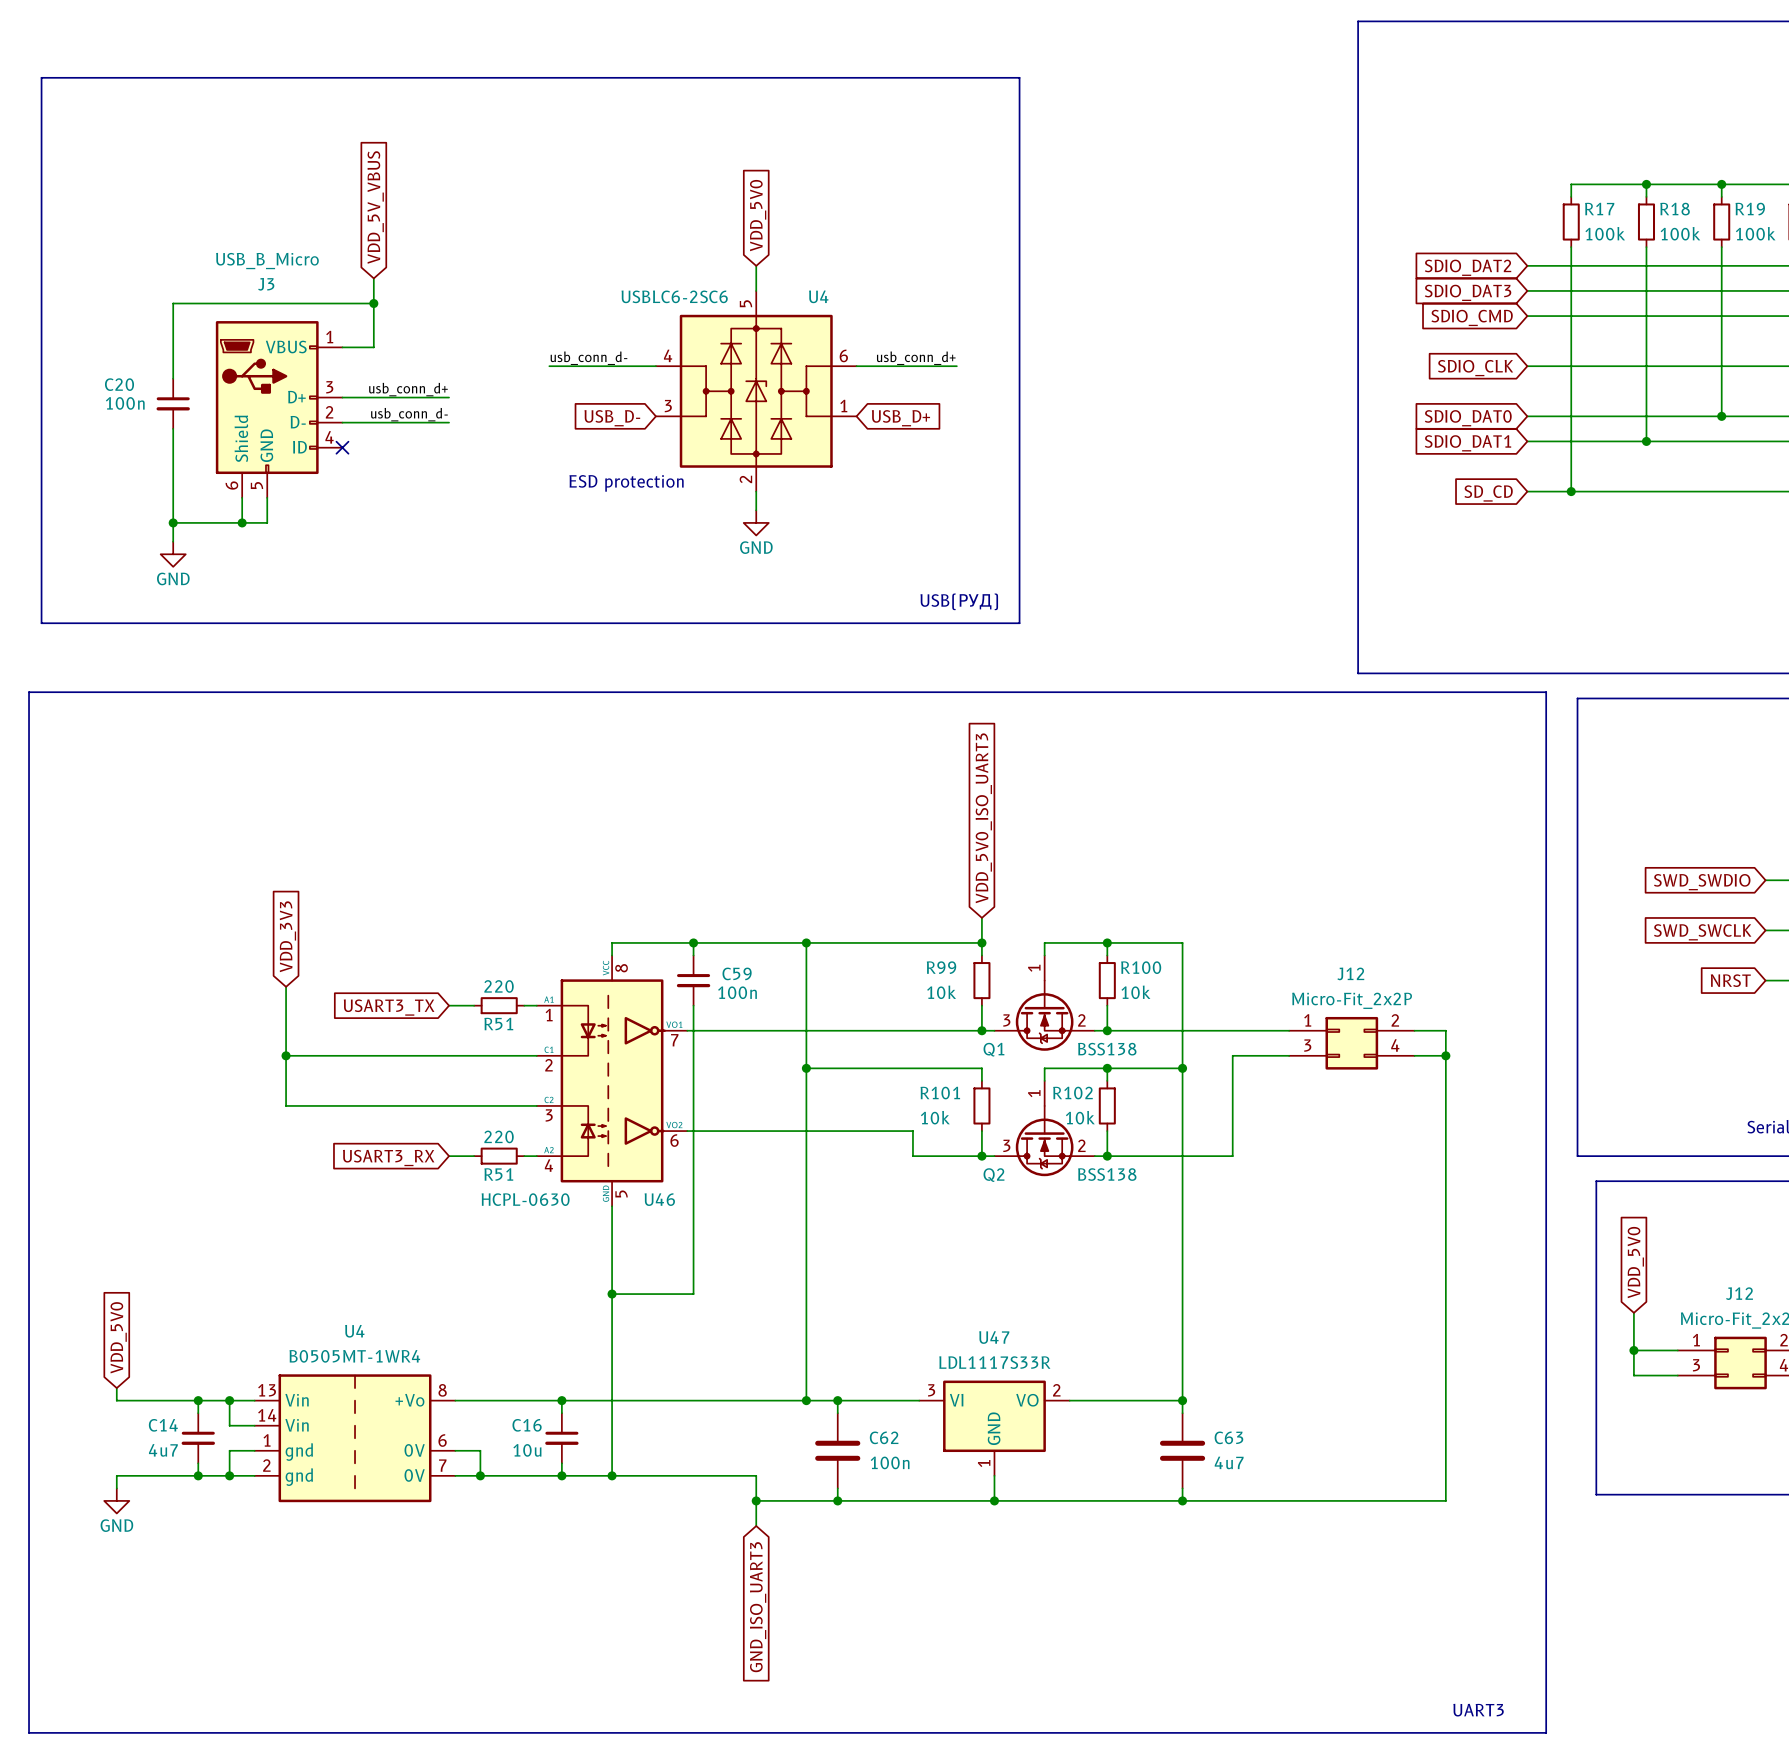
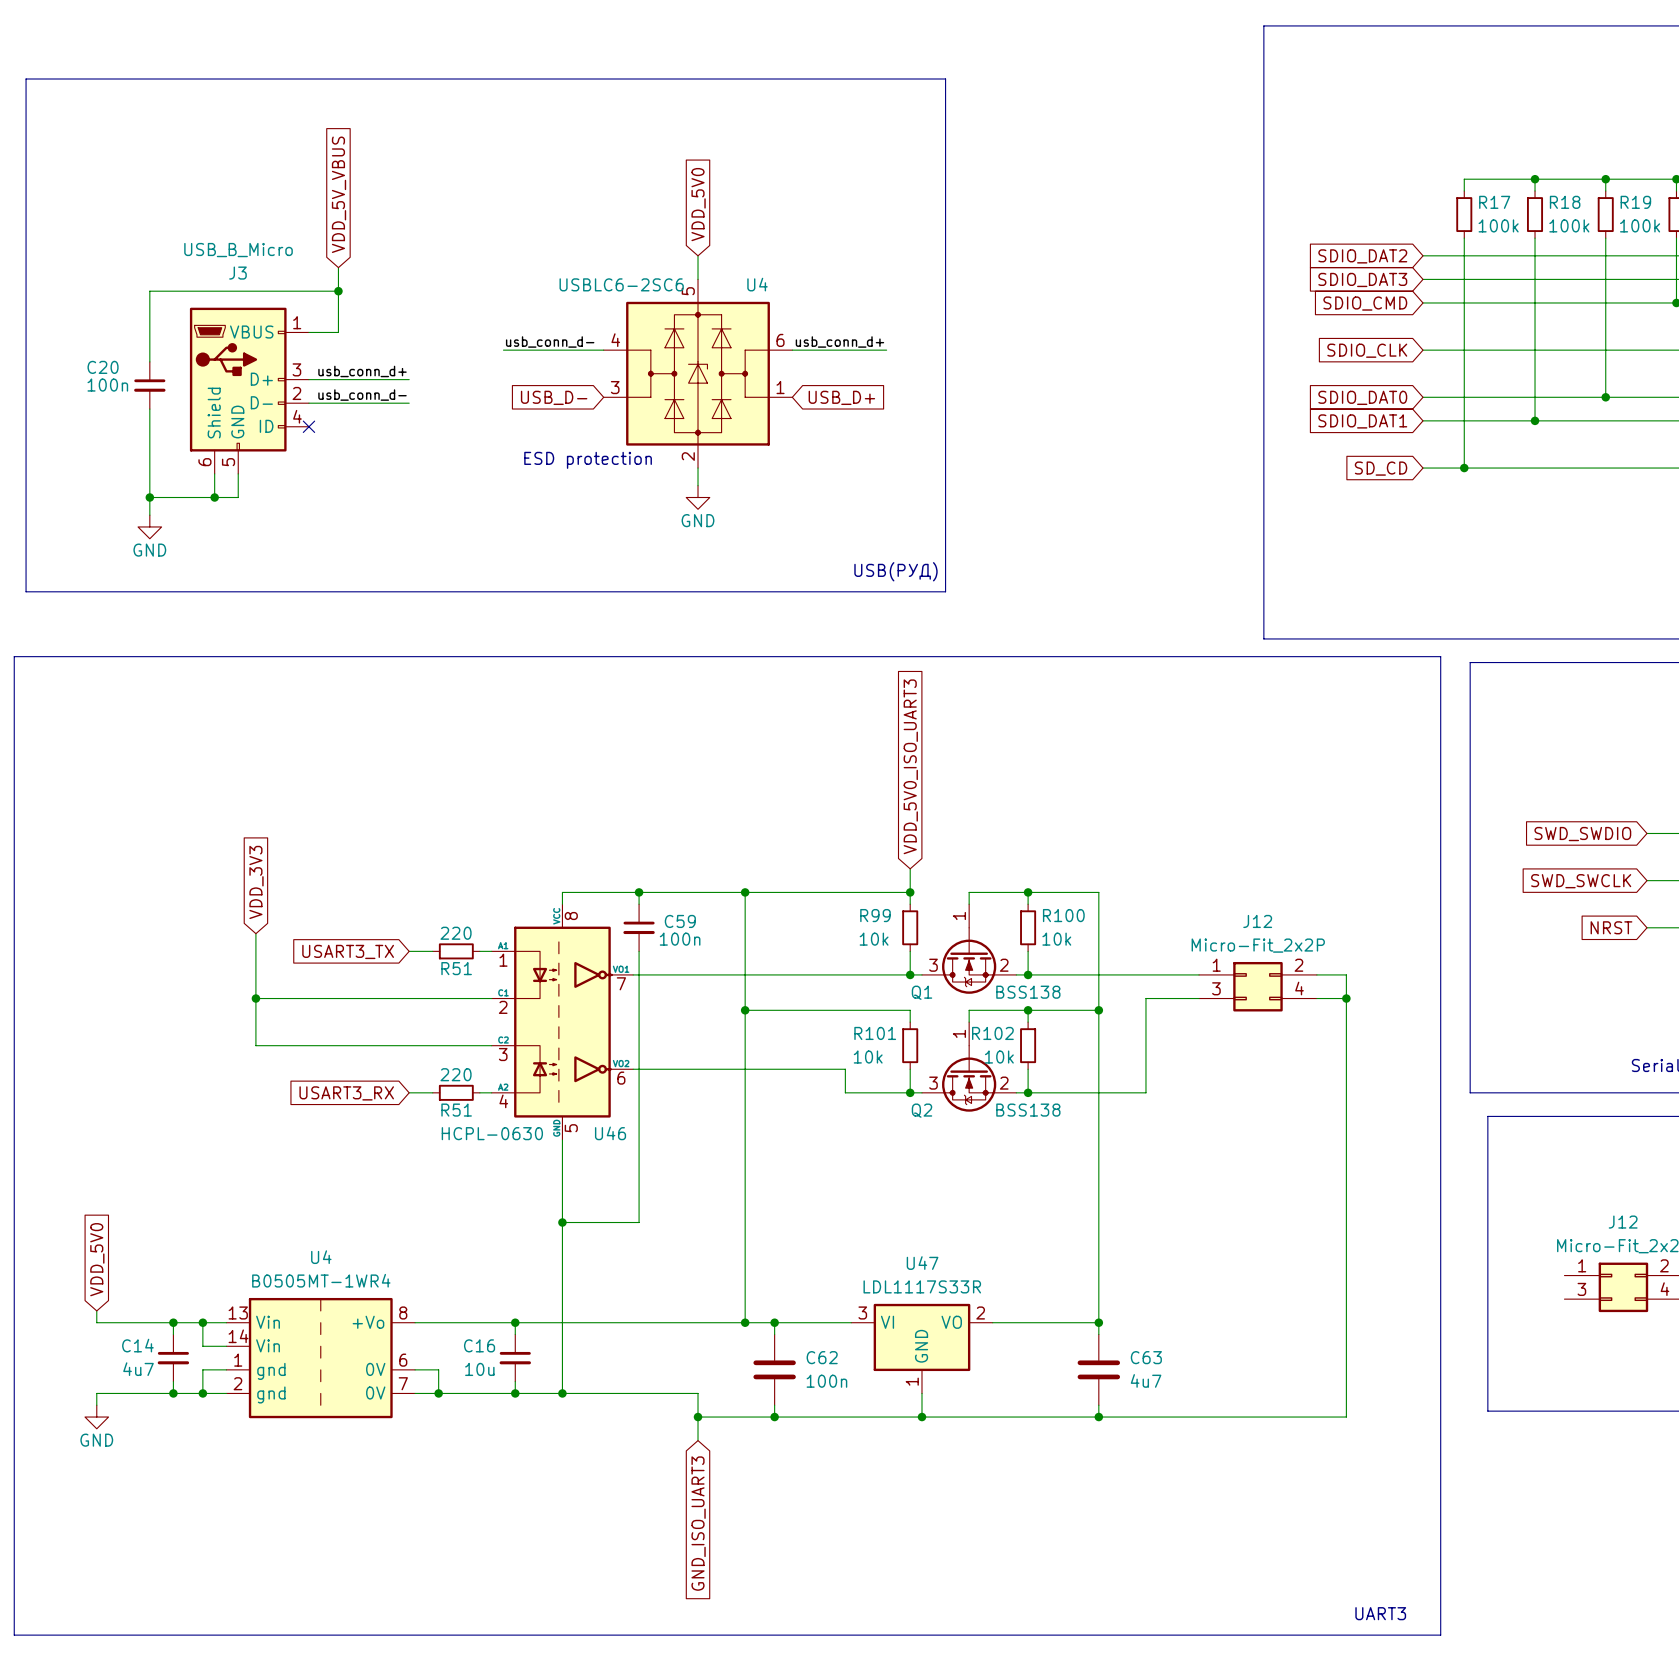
global label: VDD_5V0 (1635, 1262) -> none
wire: (1633, 1312) (1633, 1375) (1677, 1375) -> none
wire: (1633, 1350) (1677, 1350) -> none
junction: (1633, 1350) -> none

